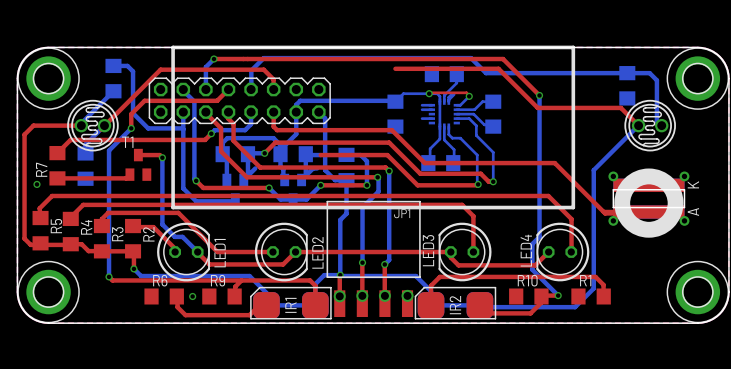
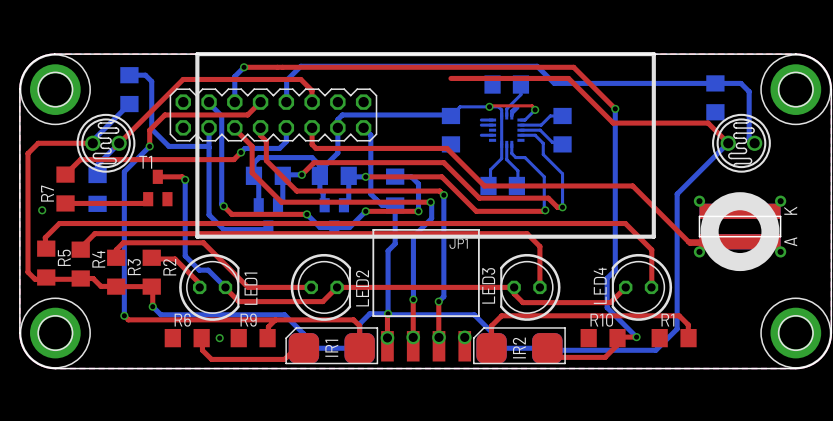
via: none -> (365, 176)
bottom track: (255, 168) (247, 175) -> none
bottom track: (317, 168) (313, 168) (305, 175) -> none

